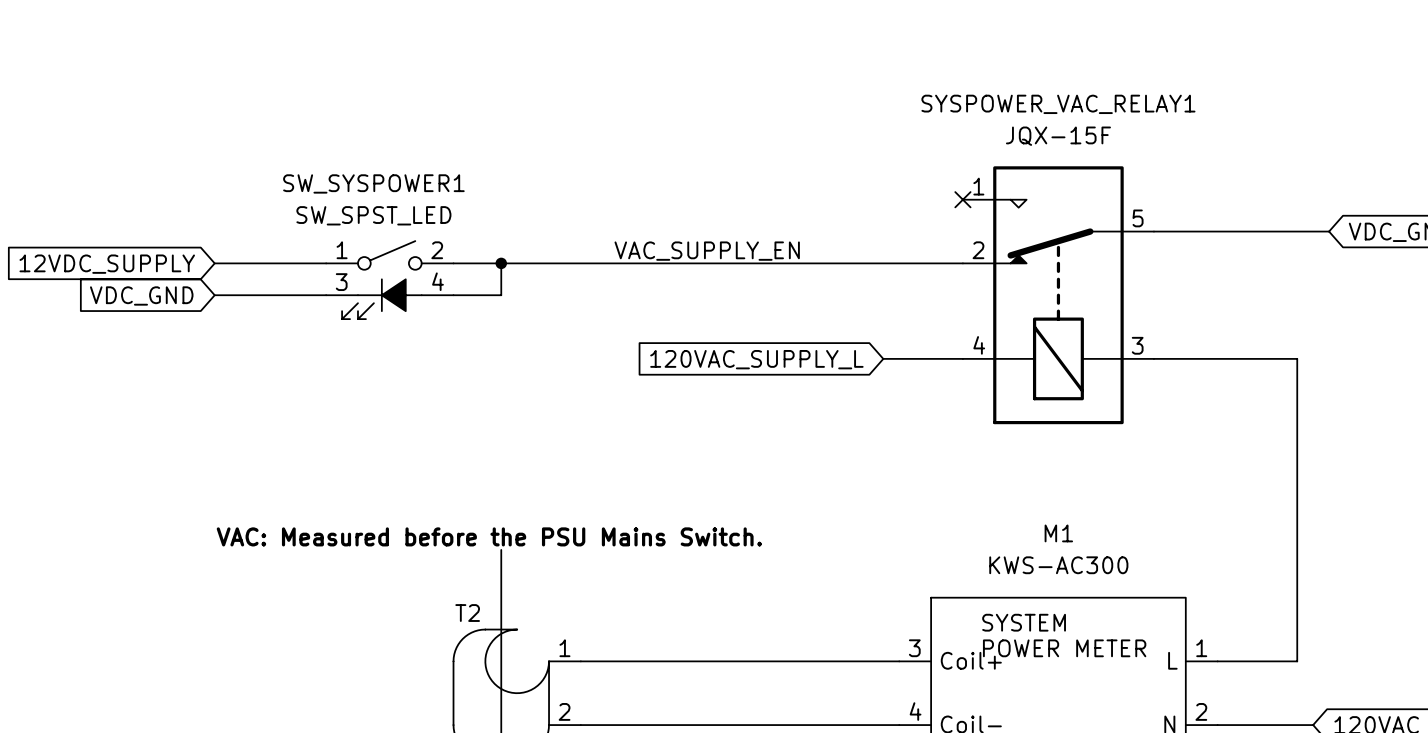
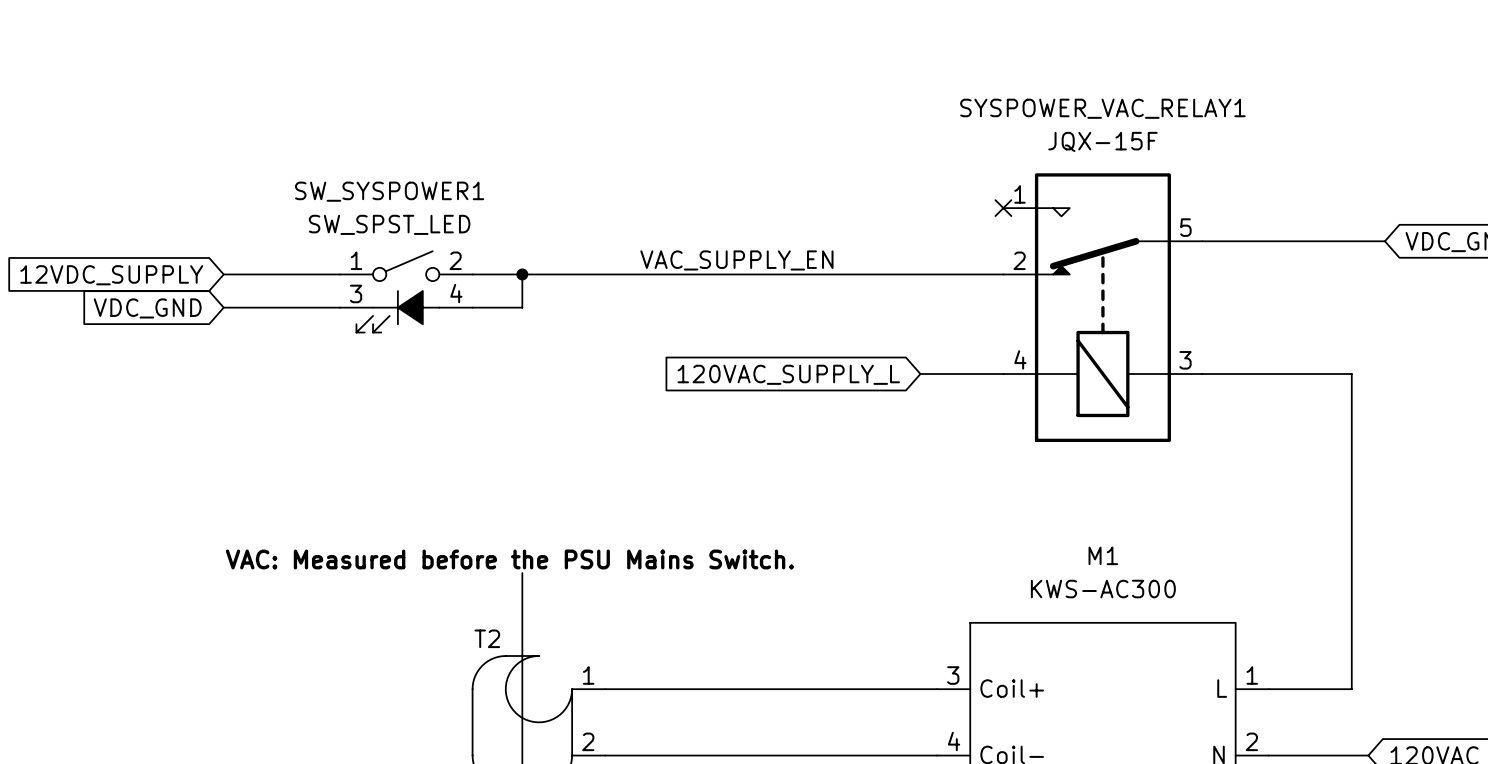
label: none -> VAC_SUPPLY_EN (736, 260)
text: VAC_SUPPLY_EN (707, 251) -> none
text: SYSTEM (1024, 622) -> none
text: POWER METER (1064, 648) -> none

